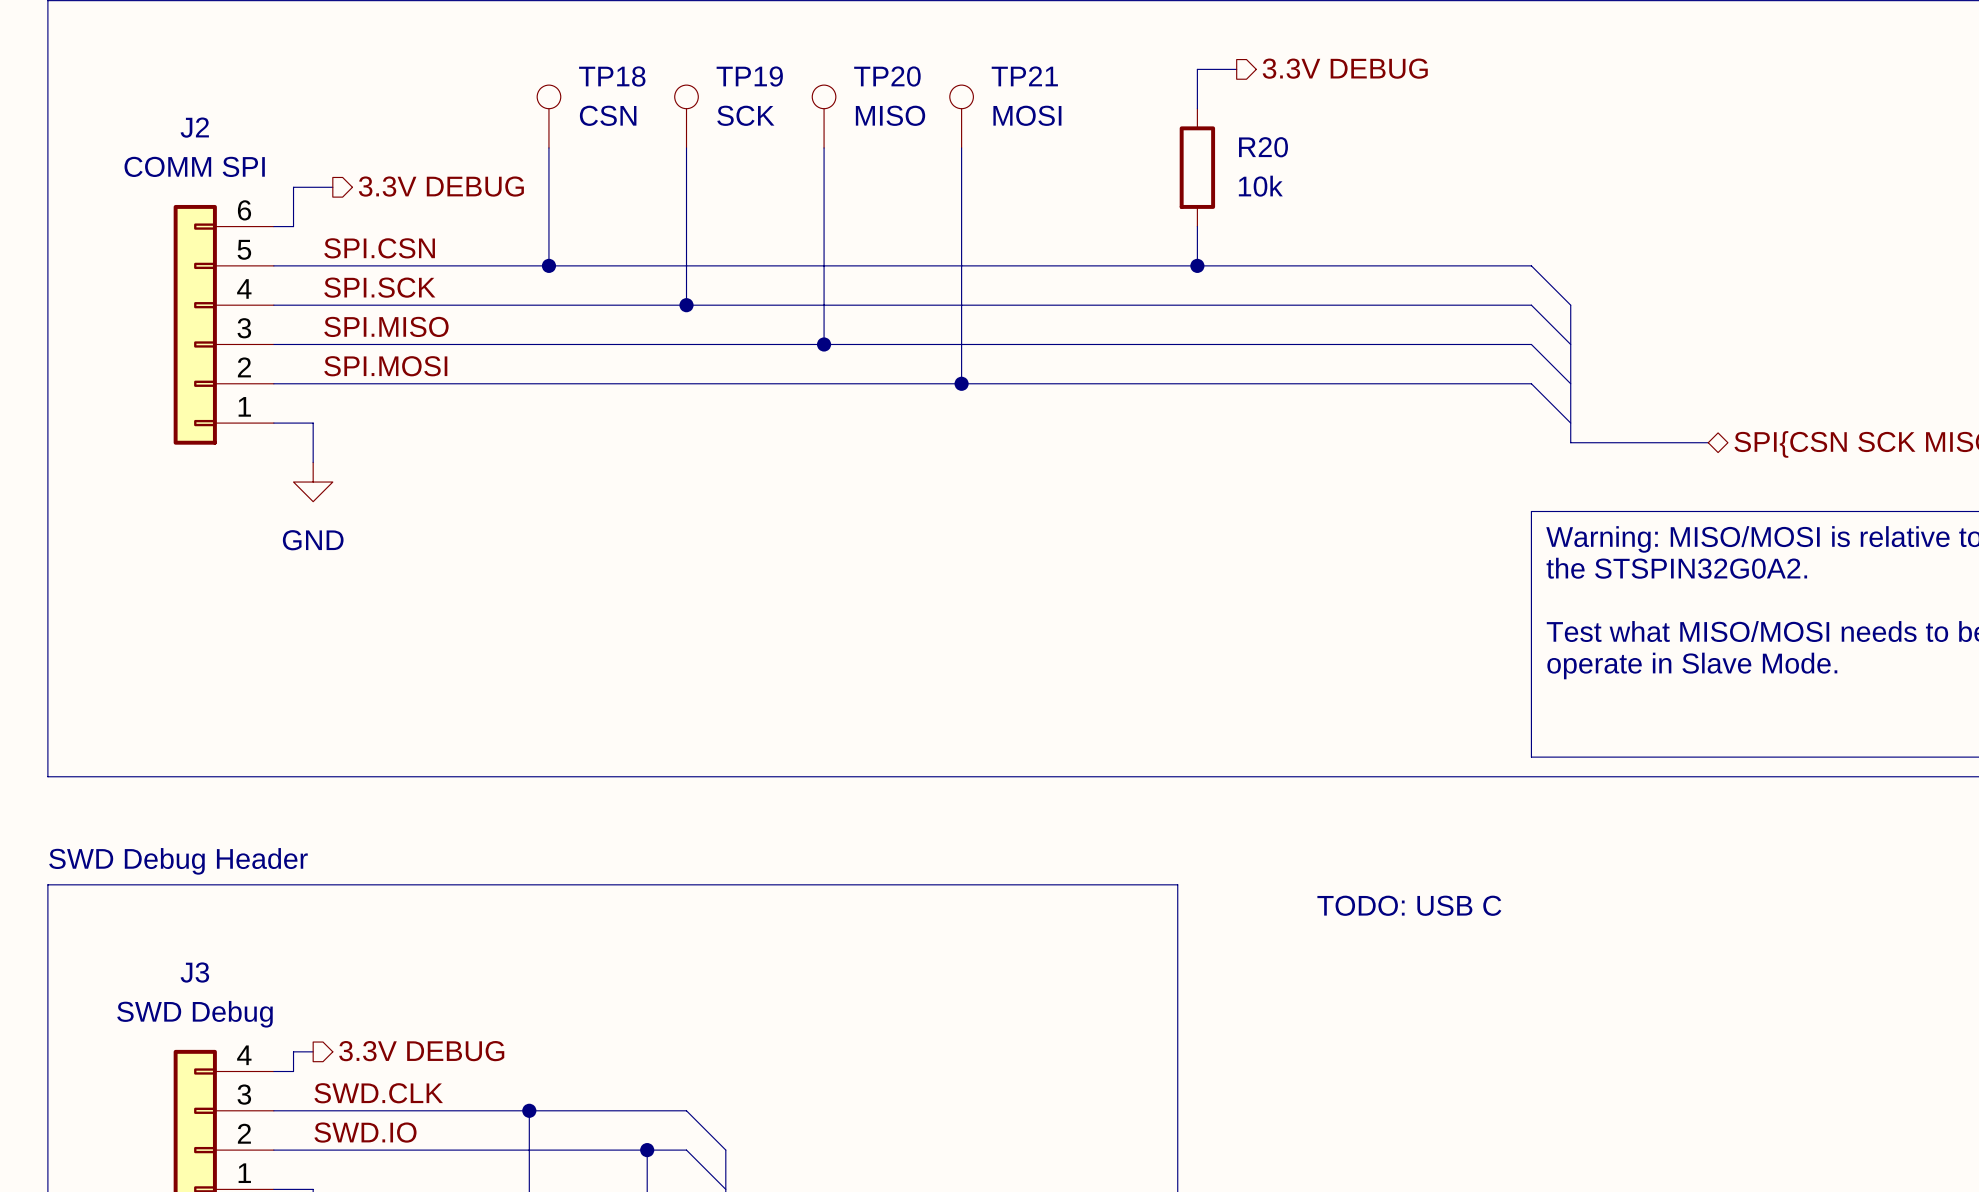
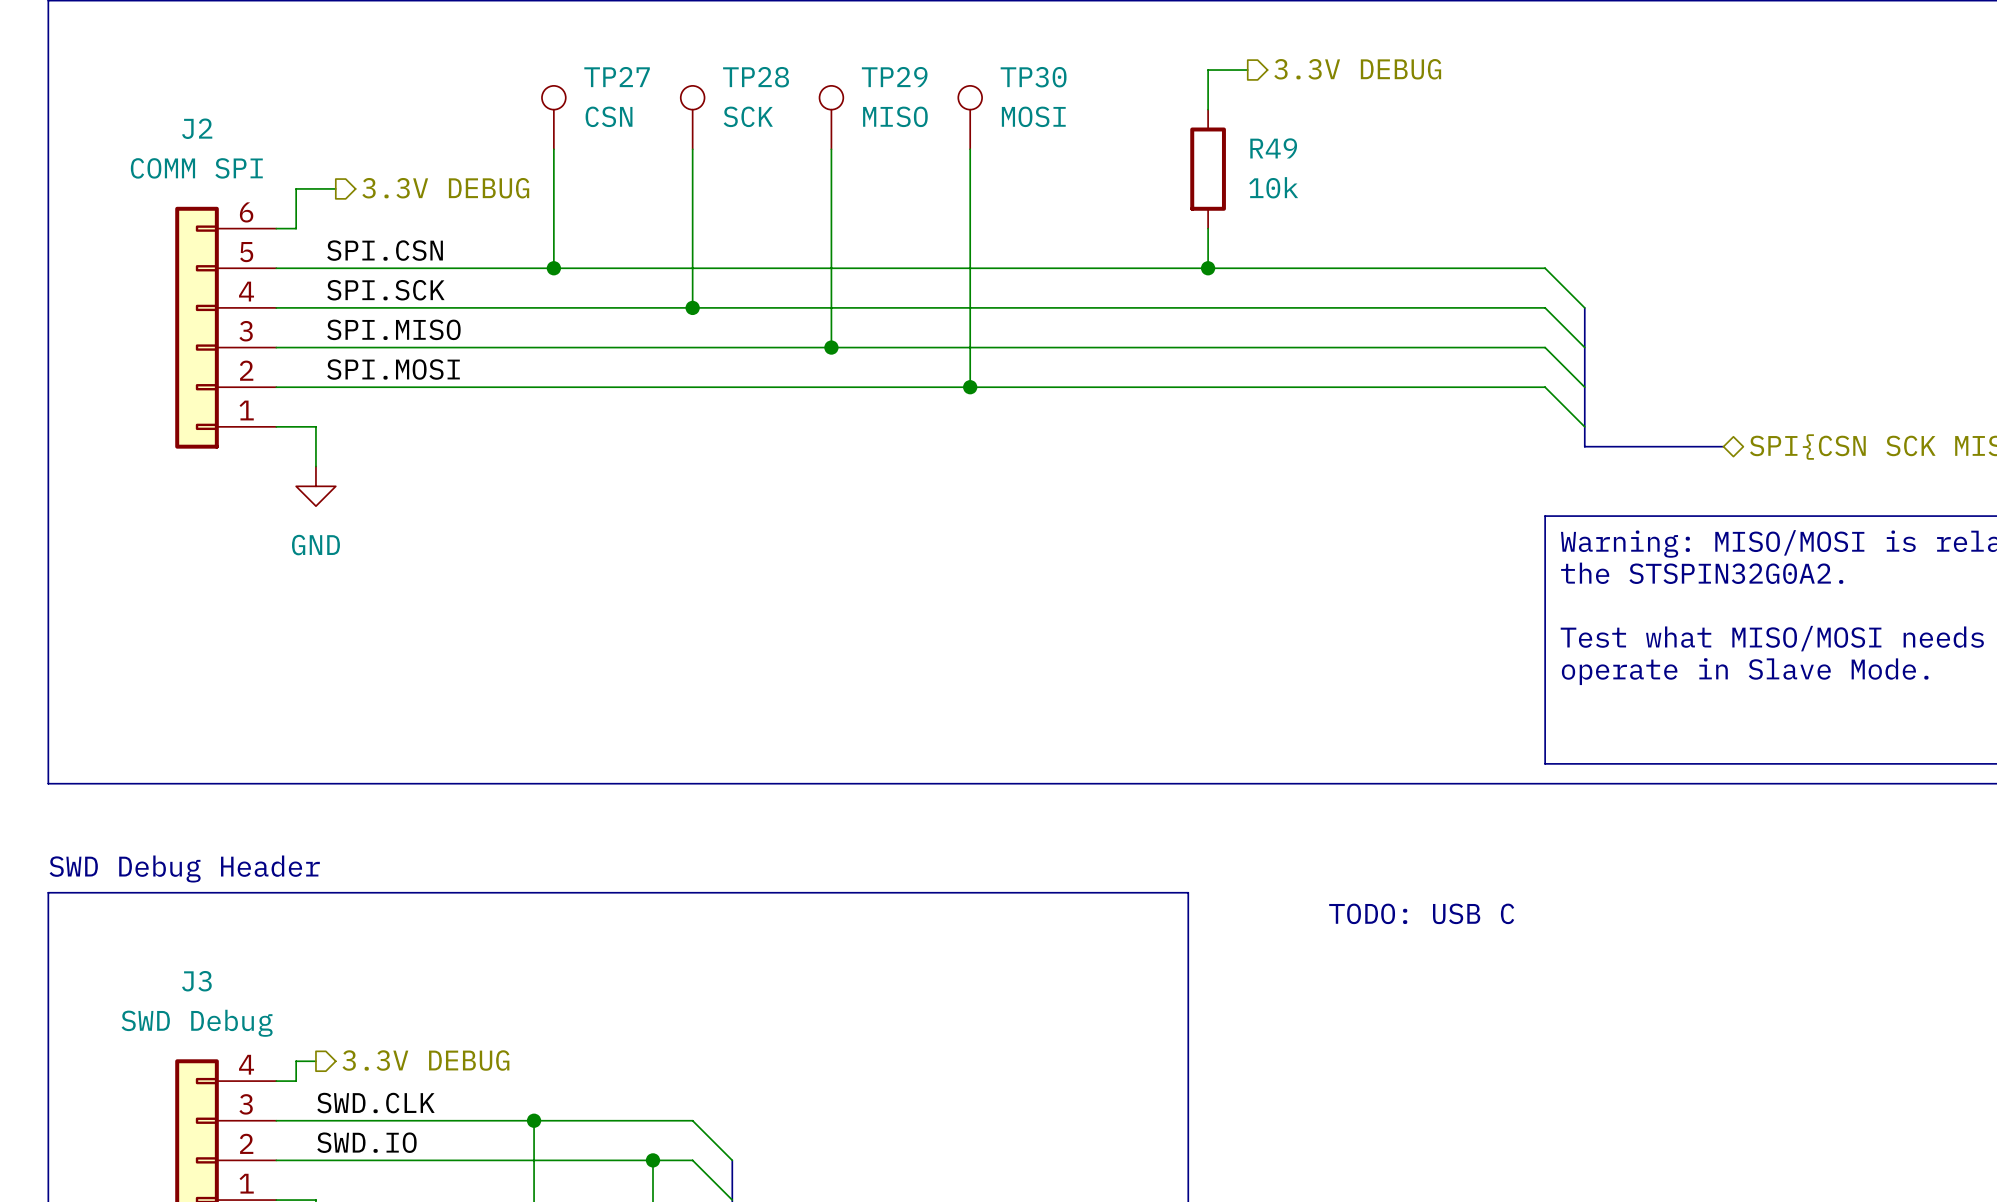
TP18 name: TP18 (612, 76) -> TP27 (617, 77)
TP19 name: TP19 (749, 76) -> TP28 (756, 77)
TP20 name: TP20 (887, 76) -> TP29 (894, 77)
TP21 name: TP21 (1024, 76) -> TP30 (1033, 77)
R20 name: R20 (1263, 147) -> R49 (1273, 148)

